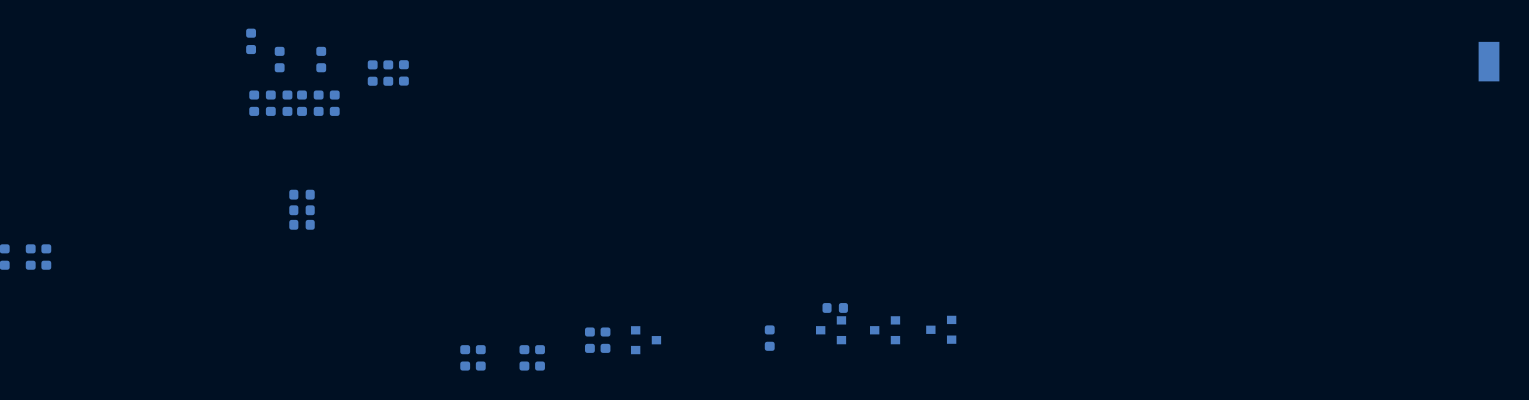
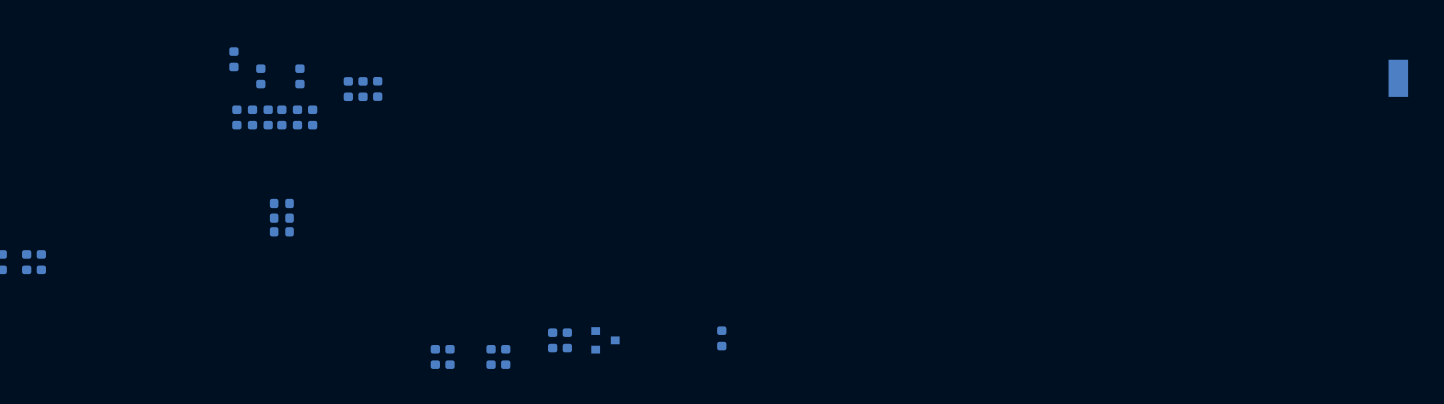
part: (835, 307) -> none
part: (941, 329) -> none
part: (831, 330) -> none
part: (885, 330) -> none

